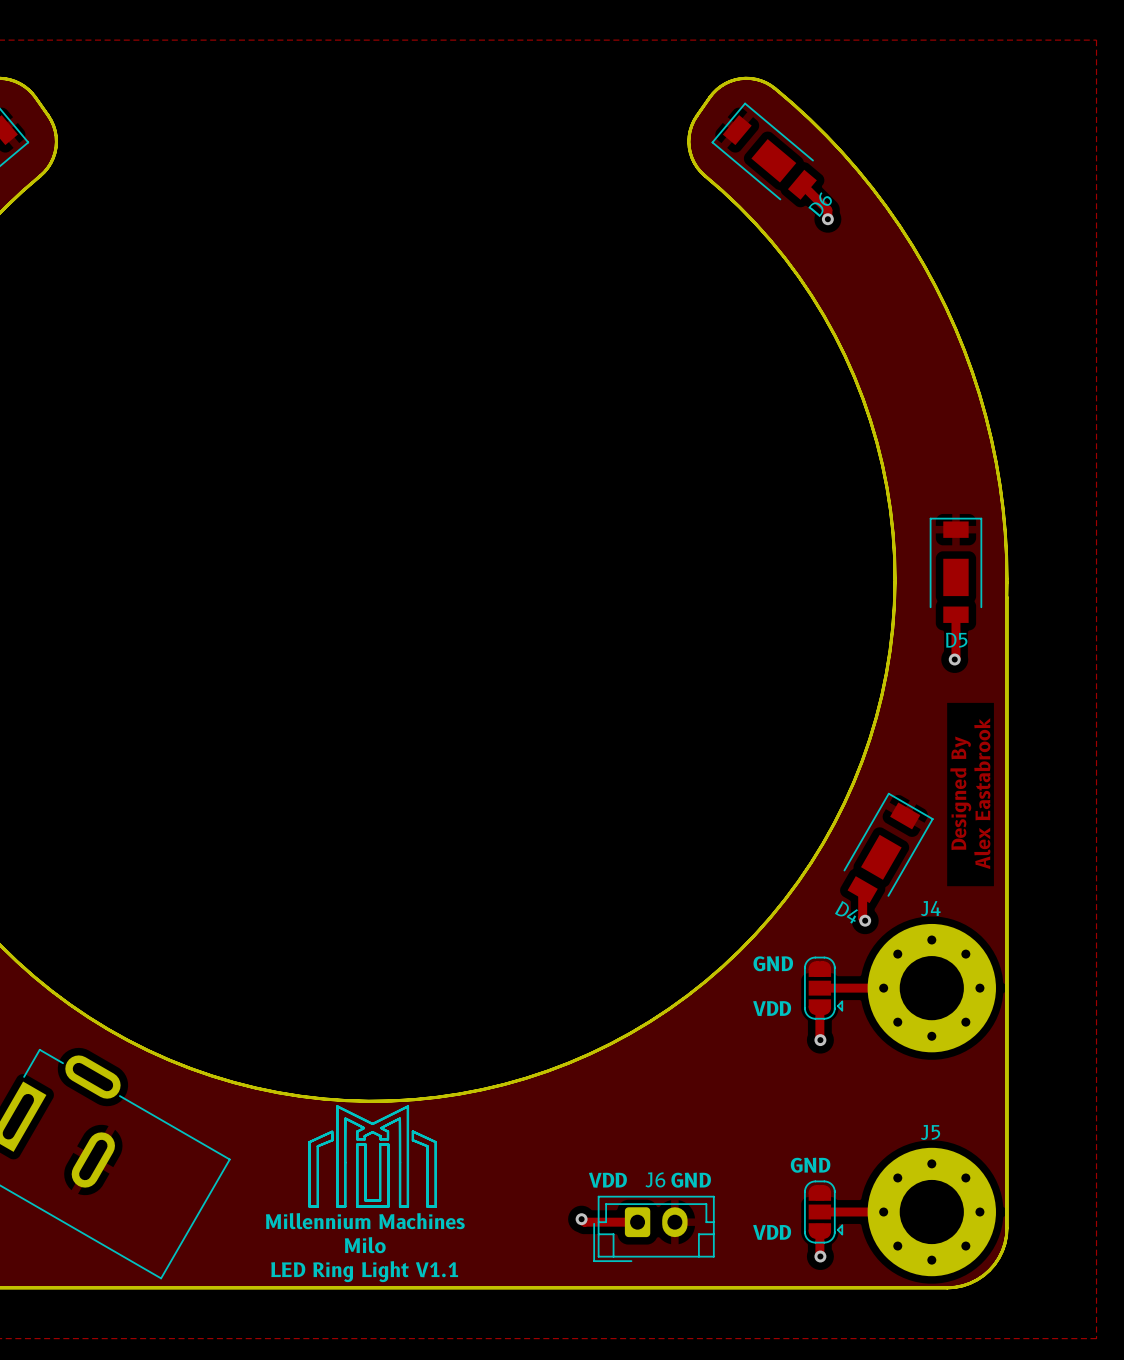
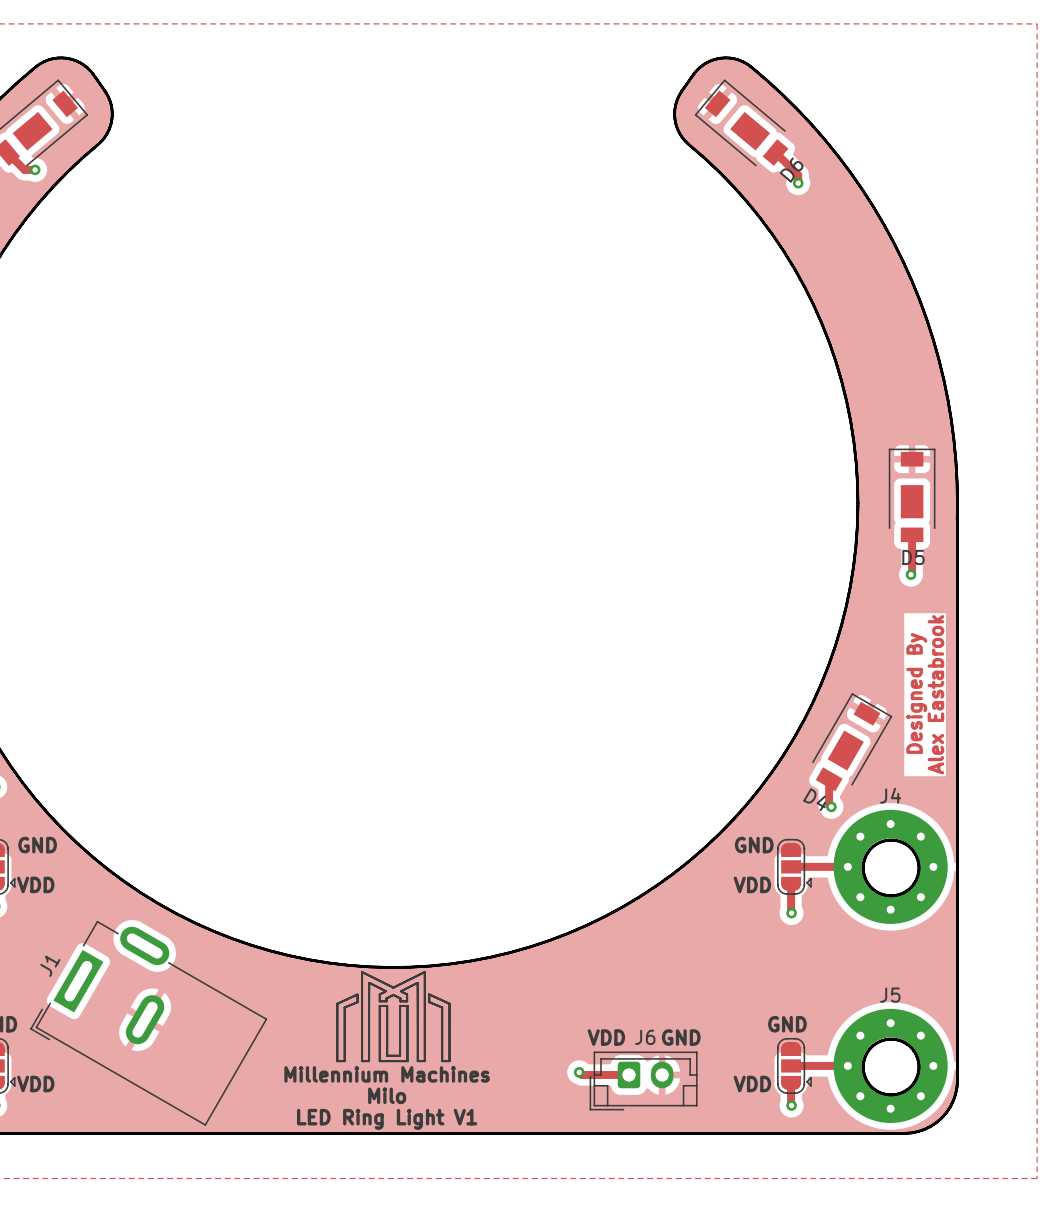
round board edge: none -> [861, 838, 921, 898]
round board edge: none -> [861, 1037, 921, 1097]
text: LED Ring Light V1.1 (364, 1271) -> LED Ring Light V1 (387, 1119)

